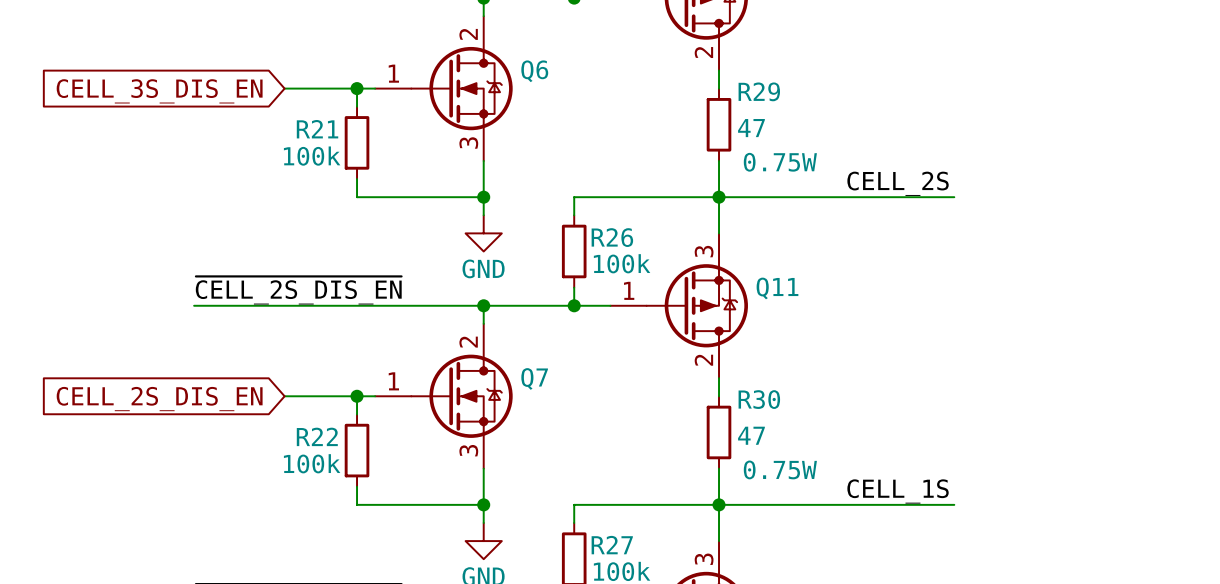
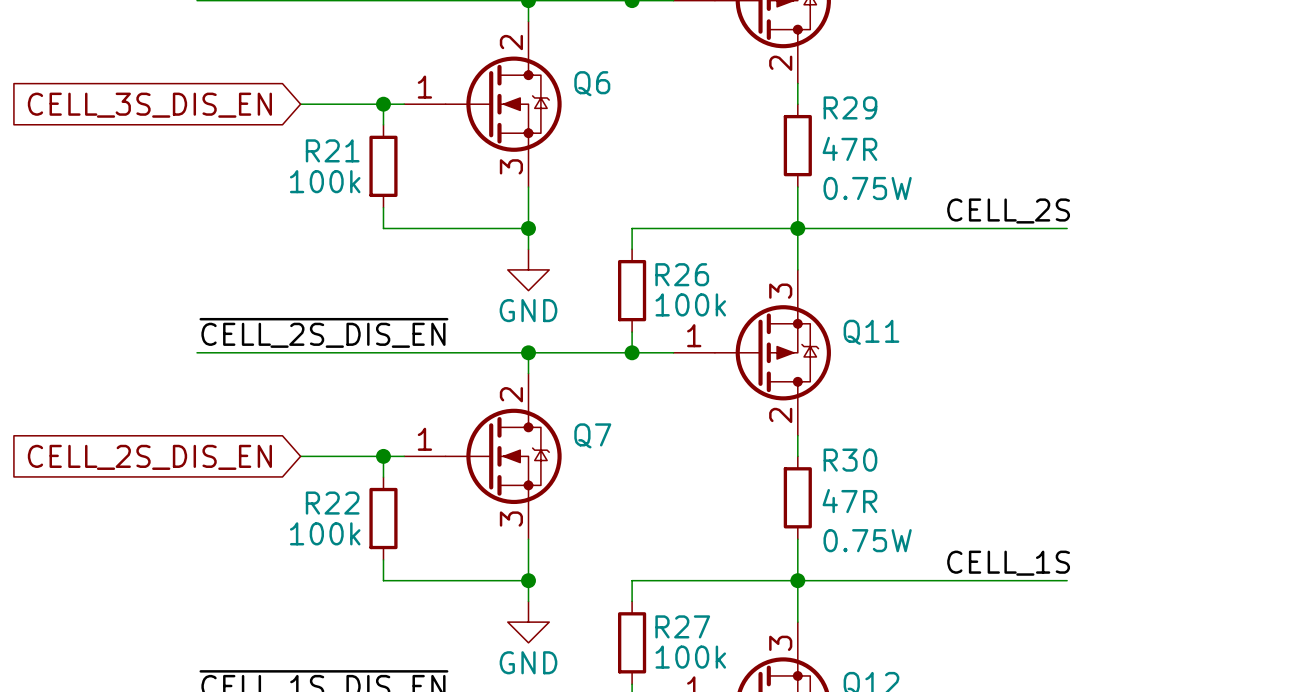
R29 value: 47 (751, 128) -> 47R (849, 148)
R30 value: 47 (751, 435) -> 47R (849, 501)

